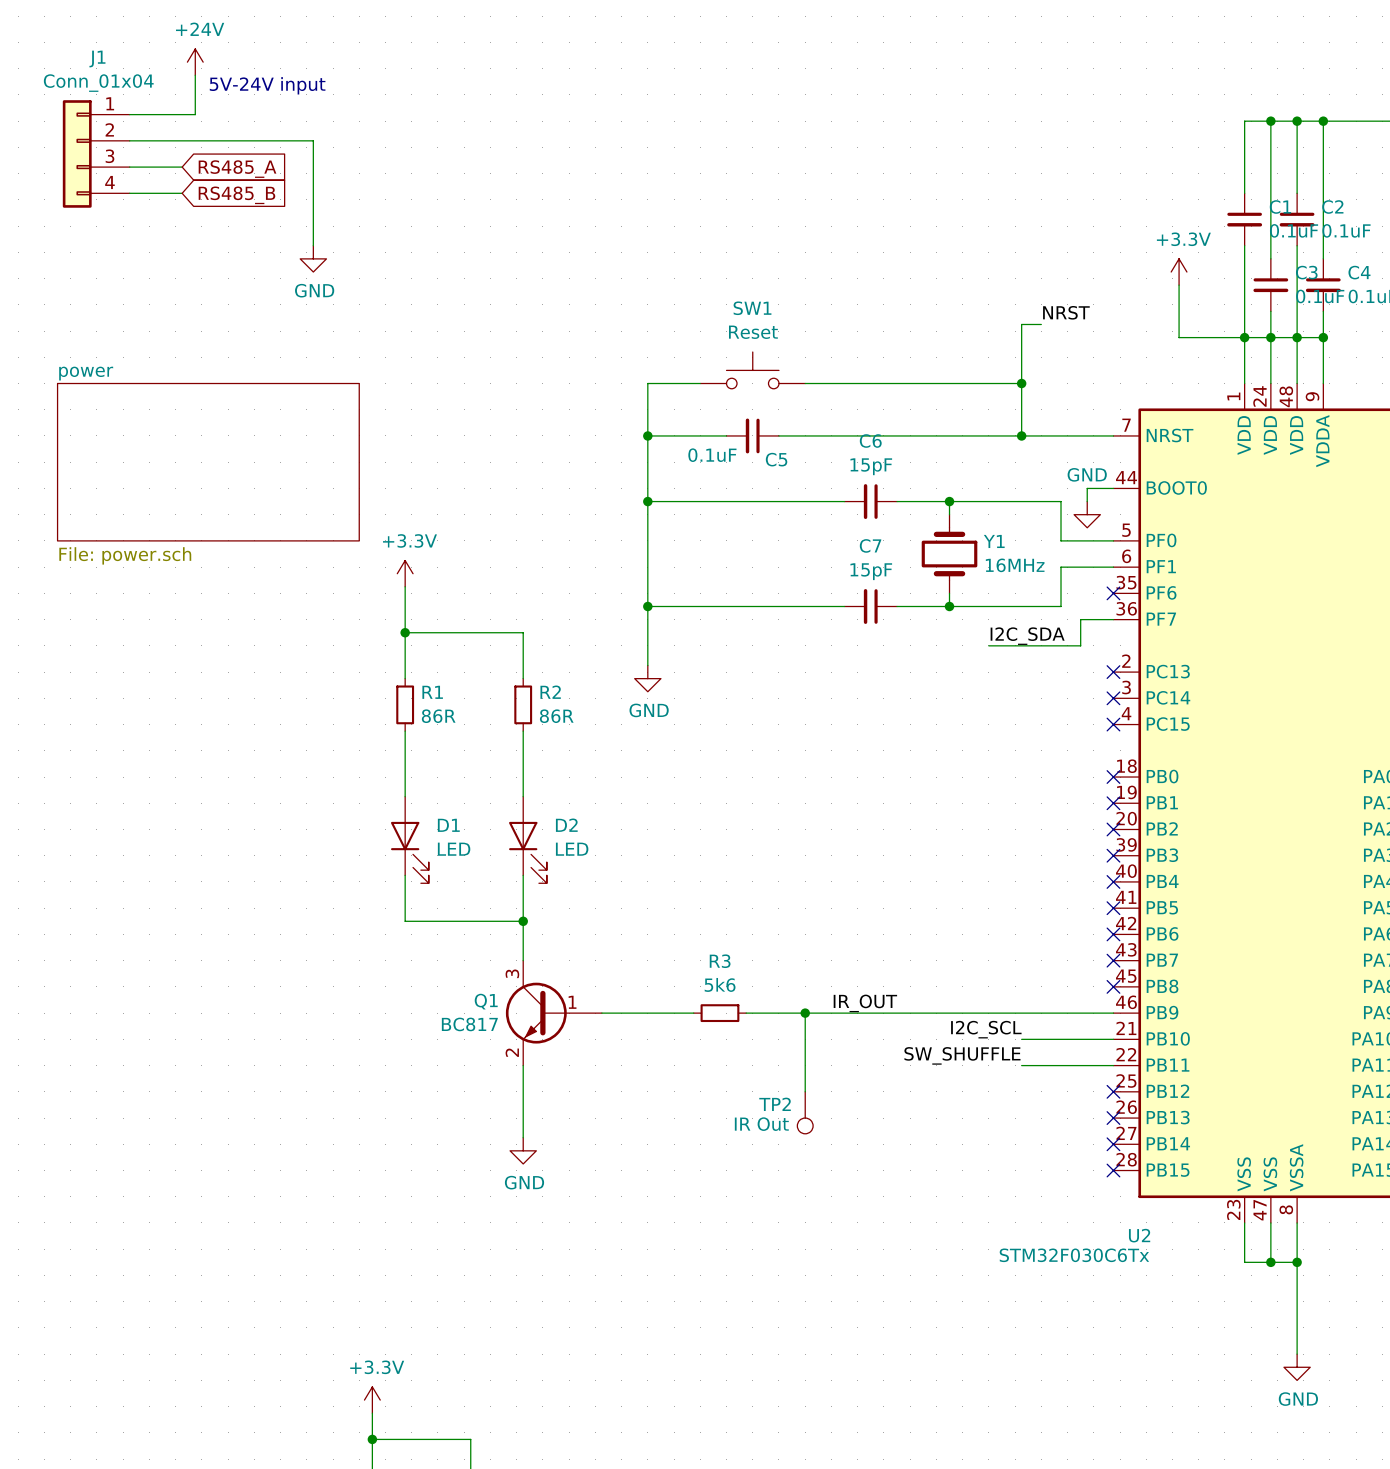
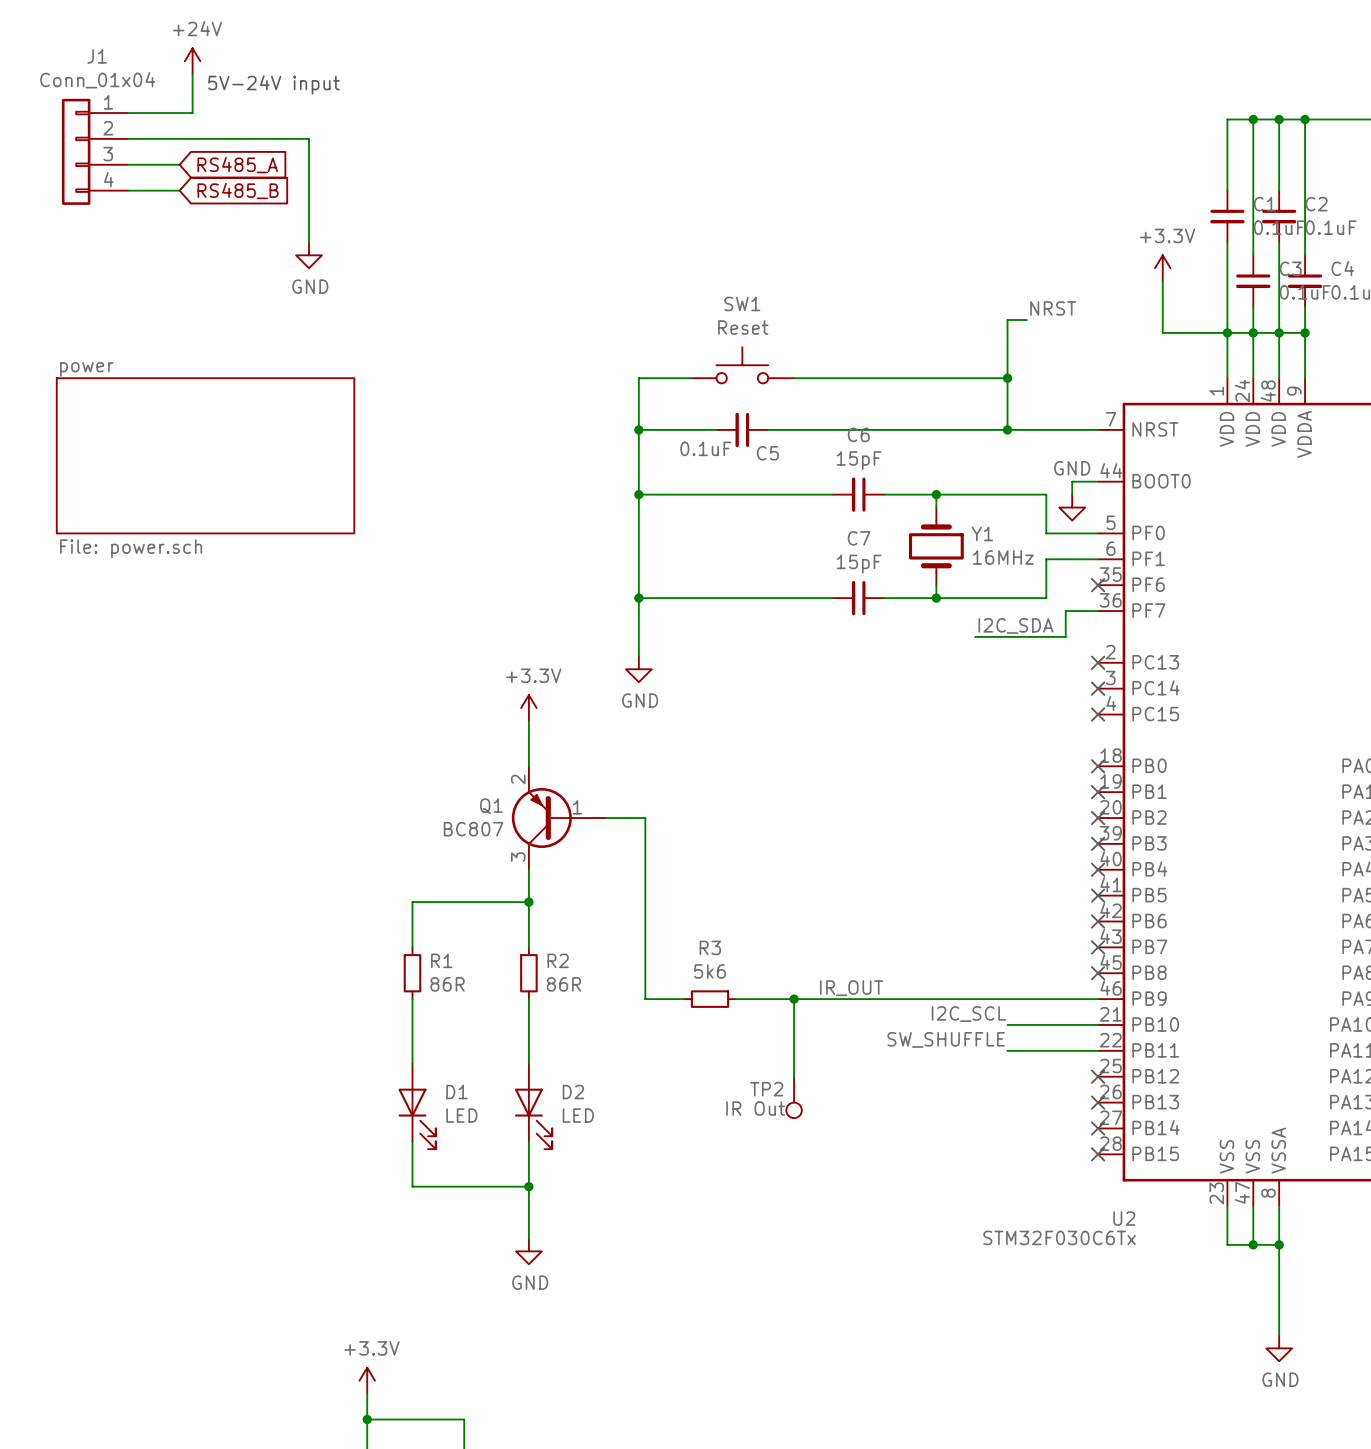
power symbol position: +3.3V (405, 573) -> +3.3V (528, 708)
wire: (405, 586) (405, 678) -> none
wire: (405, 632) (523, 632) (523, 678) -> none
junction: (405, 632) -> none
R1 position: (405, 704) -> (412, 973)
R2 position: (523, 704) -> (528, 973)
wire: (405, 731) (405, 796) -> none
wire: (523, 731) (523, 796) -> none
wire: none -> (528, 720) (528, 766)
D1 position: (409, 839) -> (417, 1106)
D2 position: (527, 839) -> (533, 1106)
wire: (405, 875) (405, 921) (523, 921) -> none
wire: (523, 875) (523, 960) -> none
wire: none -> (528, 869) (528, 947)
wire: none -> (528, 902) (412, 902) (412, 947)
junction position: (523, 921) -> (528, 902)
Q1 symbol: [505, 960, 602, 1066] -> [511, 766, 607, 870]
wire: none -> (412, 999) (412, 1063)
wire: none -> (528, 999) (528, 1063)
wire: (601, 1013) (654, 1013) -> (606, 818) (645, 818) (645, 999)
Q1 value: BC817 (469, 1024) -> BC807 (473, 829)
wire: (523, 1065) (523, 1137) -> none
power symbol position: GND (523, 1150) -> GND (528, 1251)
wire: none -> (412, 1141) (412, 1186) (528, 1186)
wire: none -> (528, 1141) (528, 1238)
junction: none -> (528, 1186)

